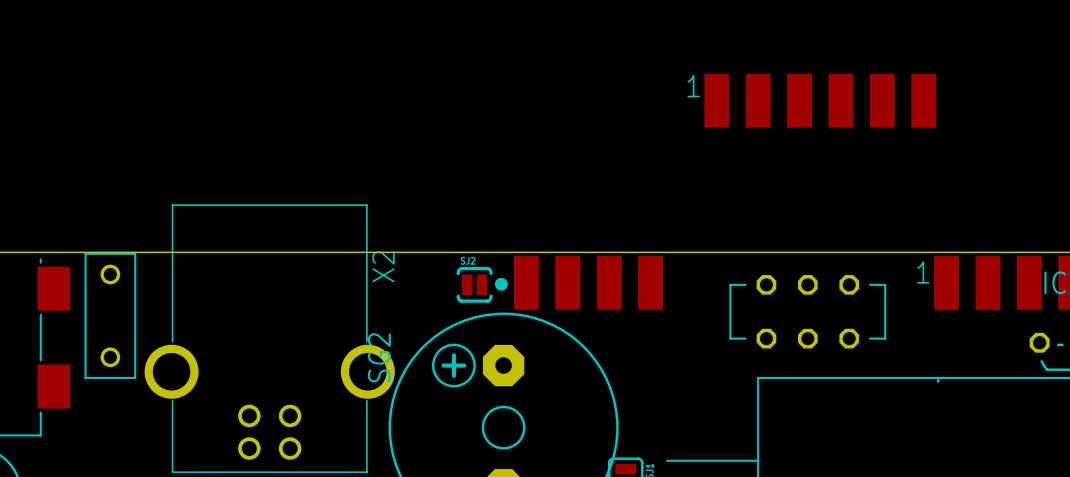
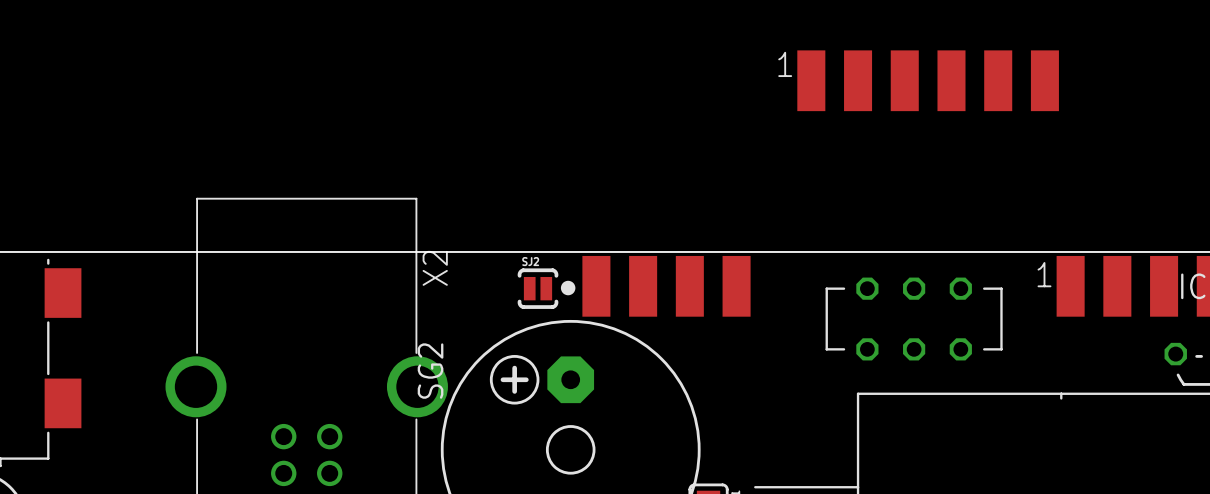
part: (110, 315) -> none

